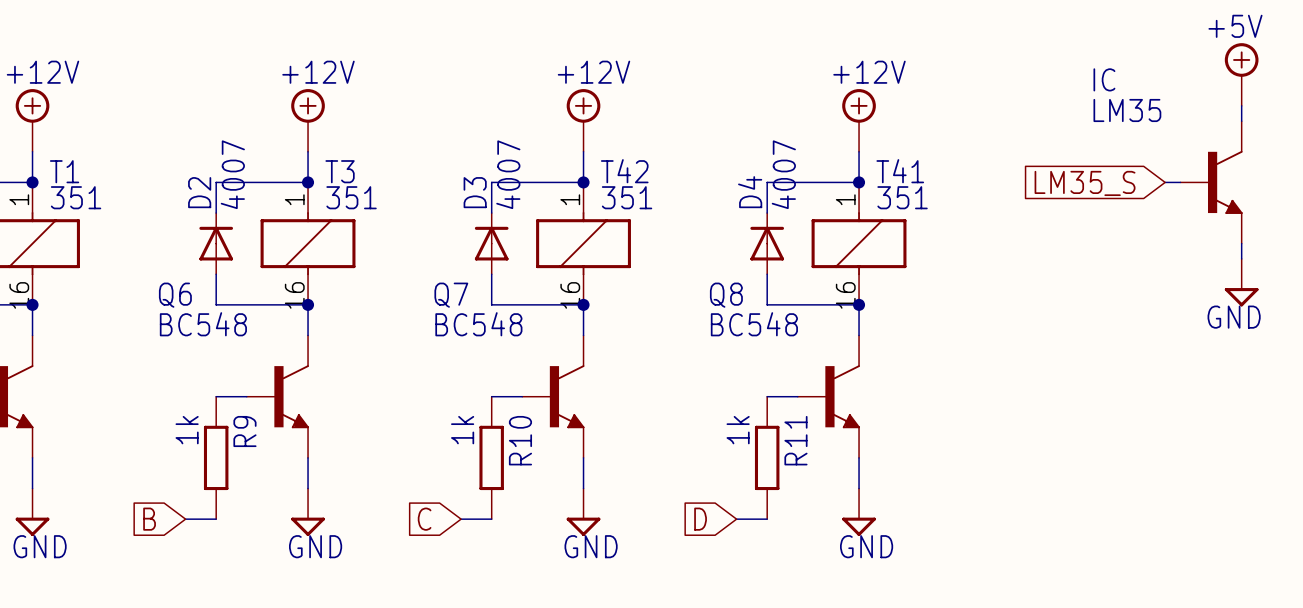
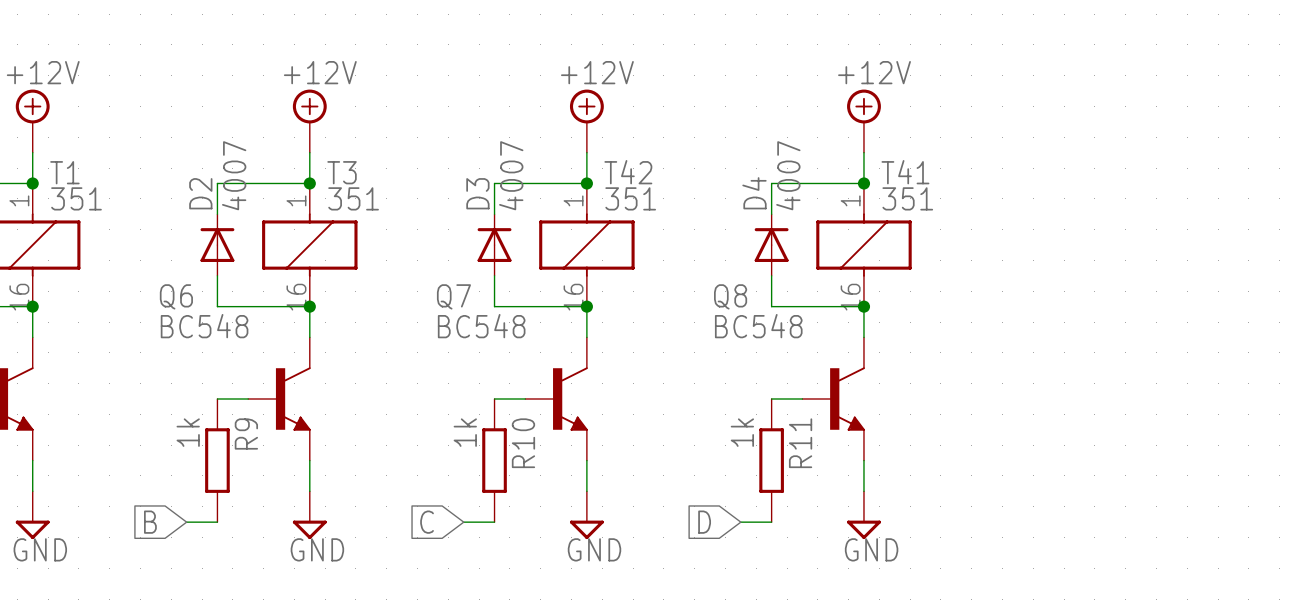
power symbol: +5V (1241, 74) -> none
wire: (1241, 105) (1241, 121) -> none
wire: (1165, 182) (1180, 182) -> none
IC: LM35 (1211, 182) -> none
global label: LM35_S (1085, 183) -> none
wire: (1241, 243) (1241, 258) -> none
power symbol: GND (1241, 282) -> none

